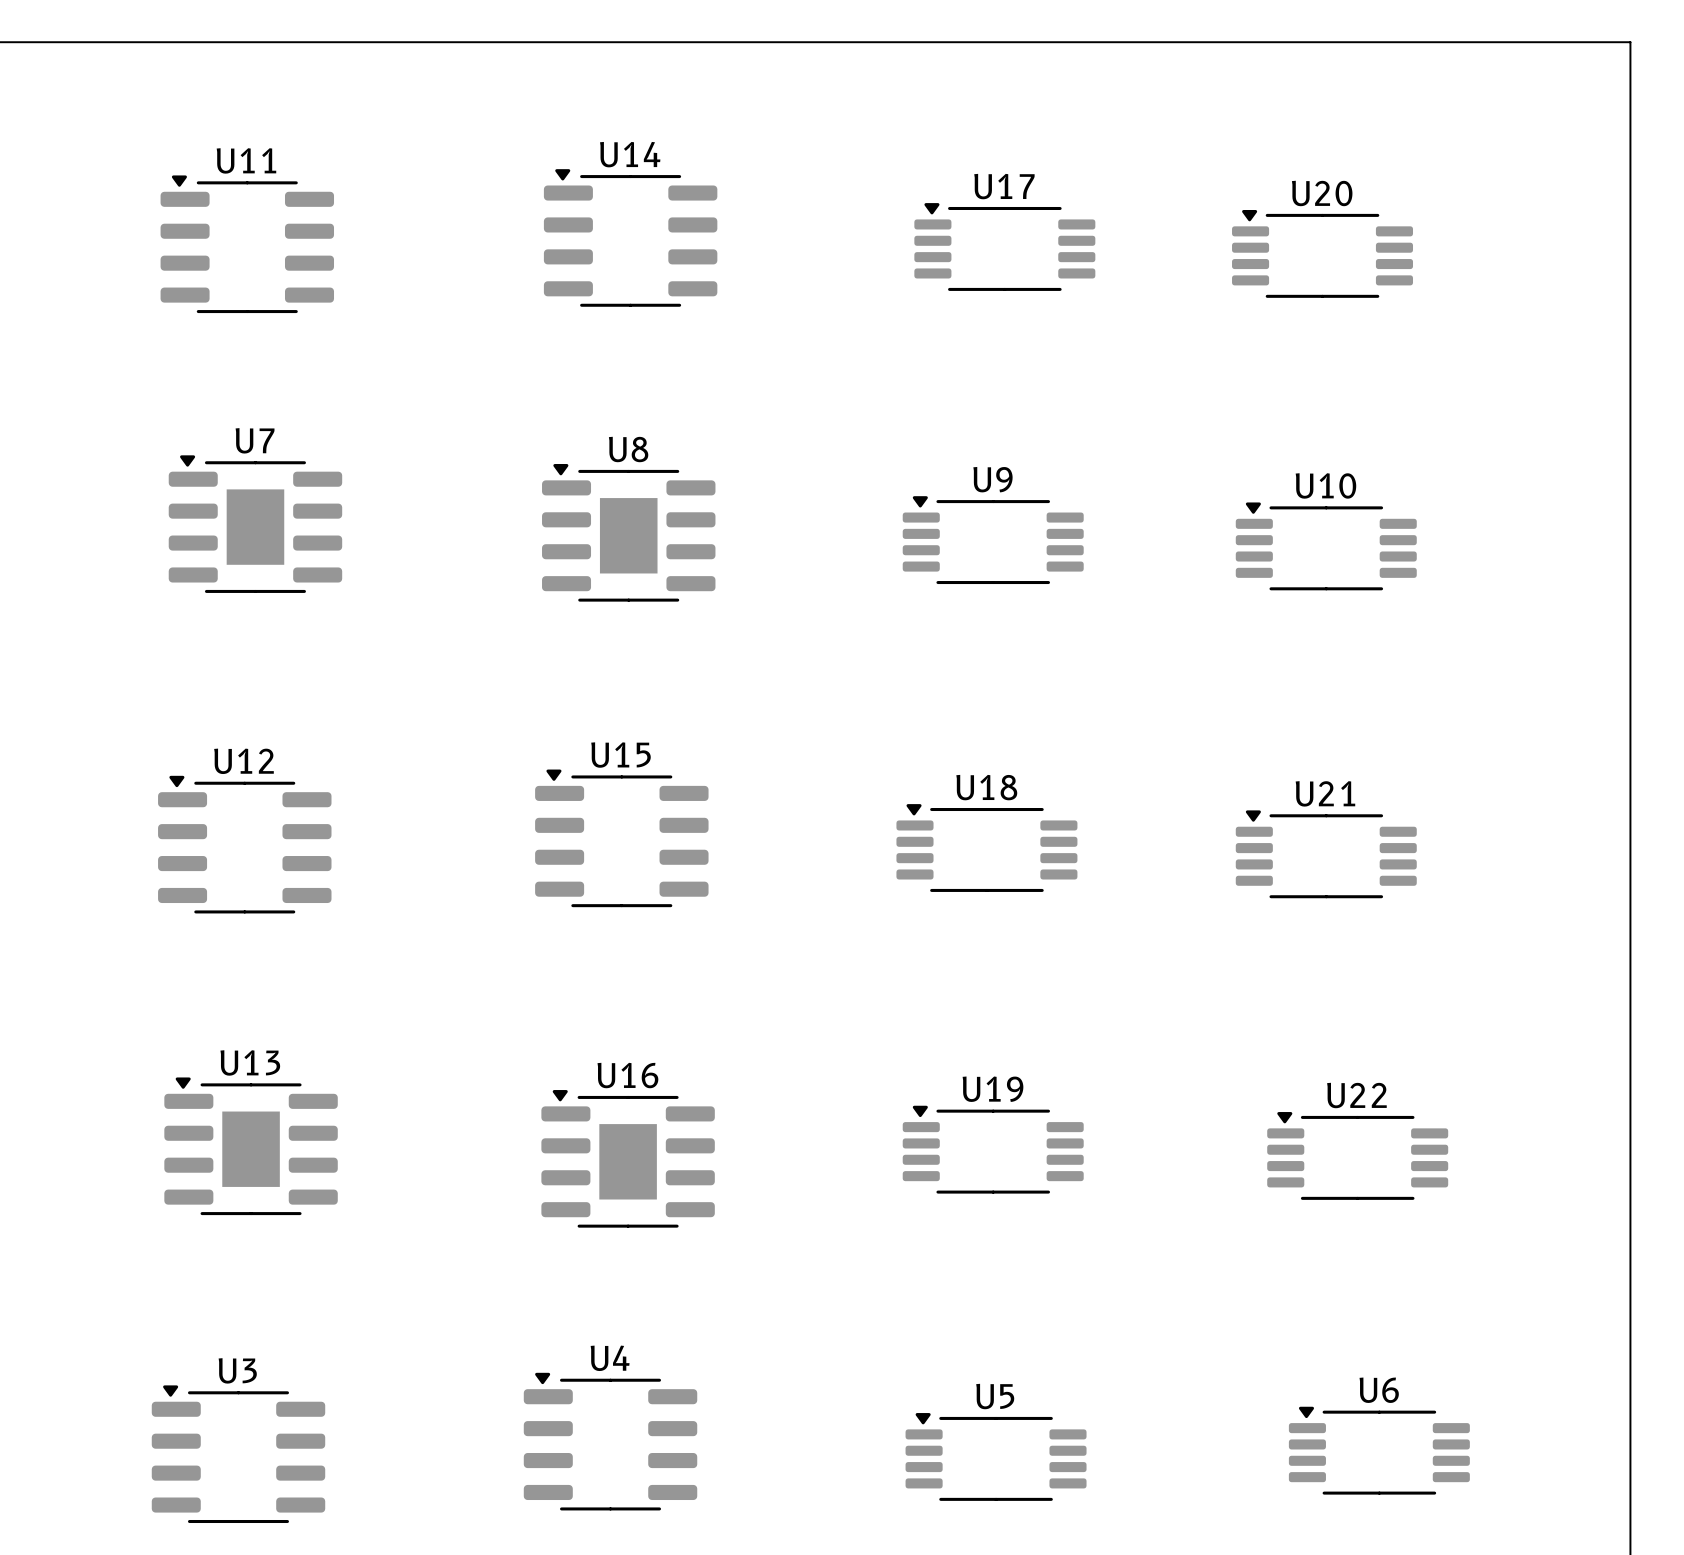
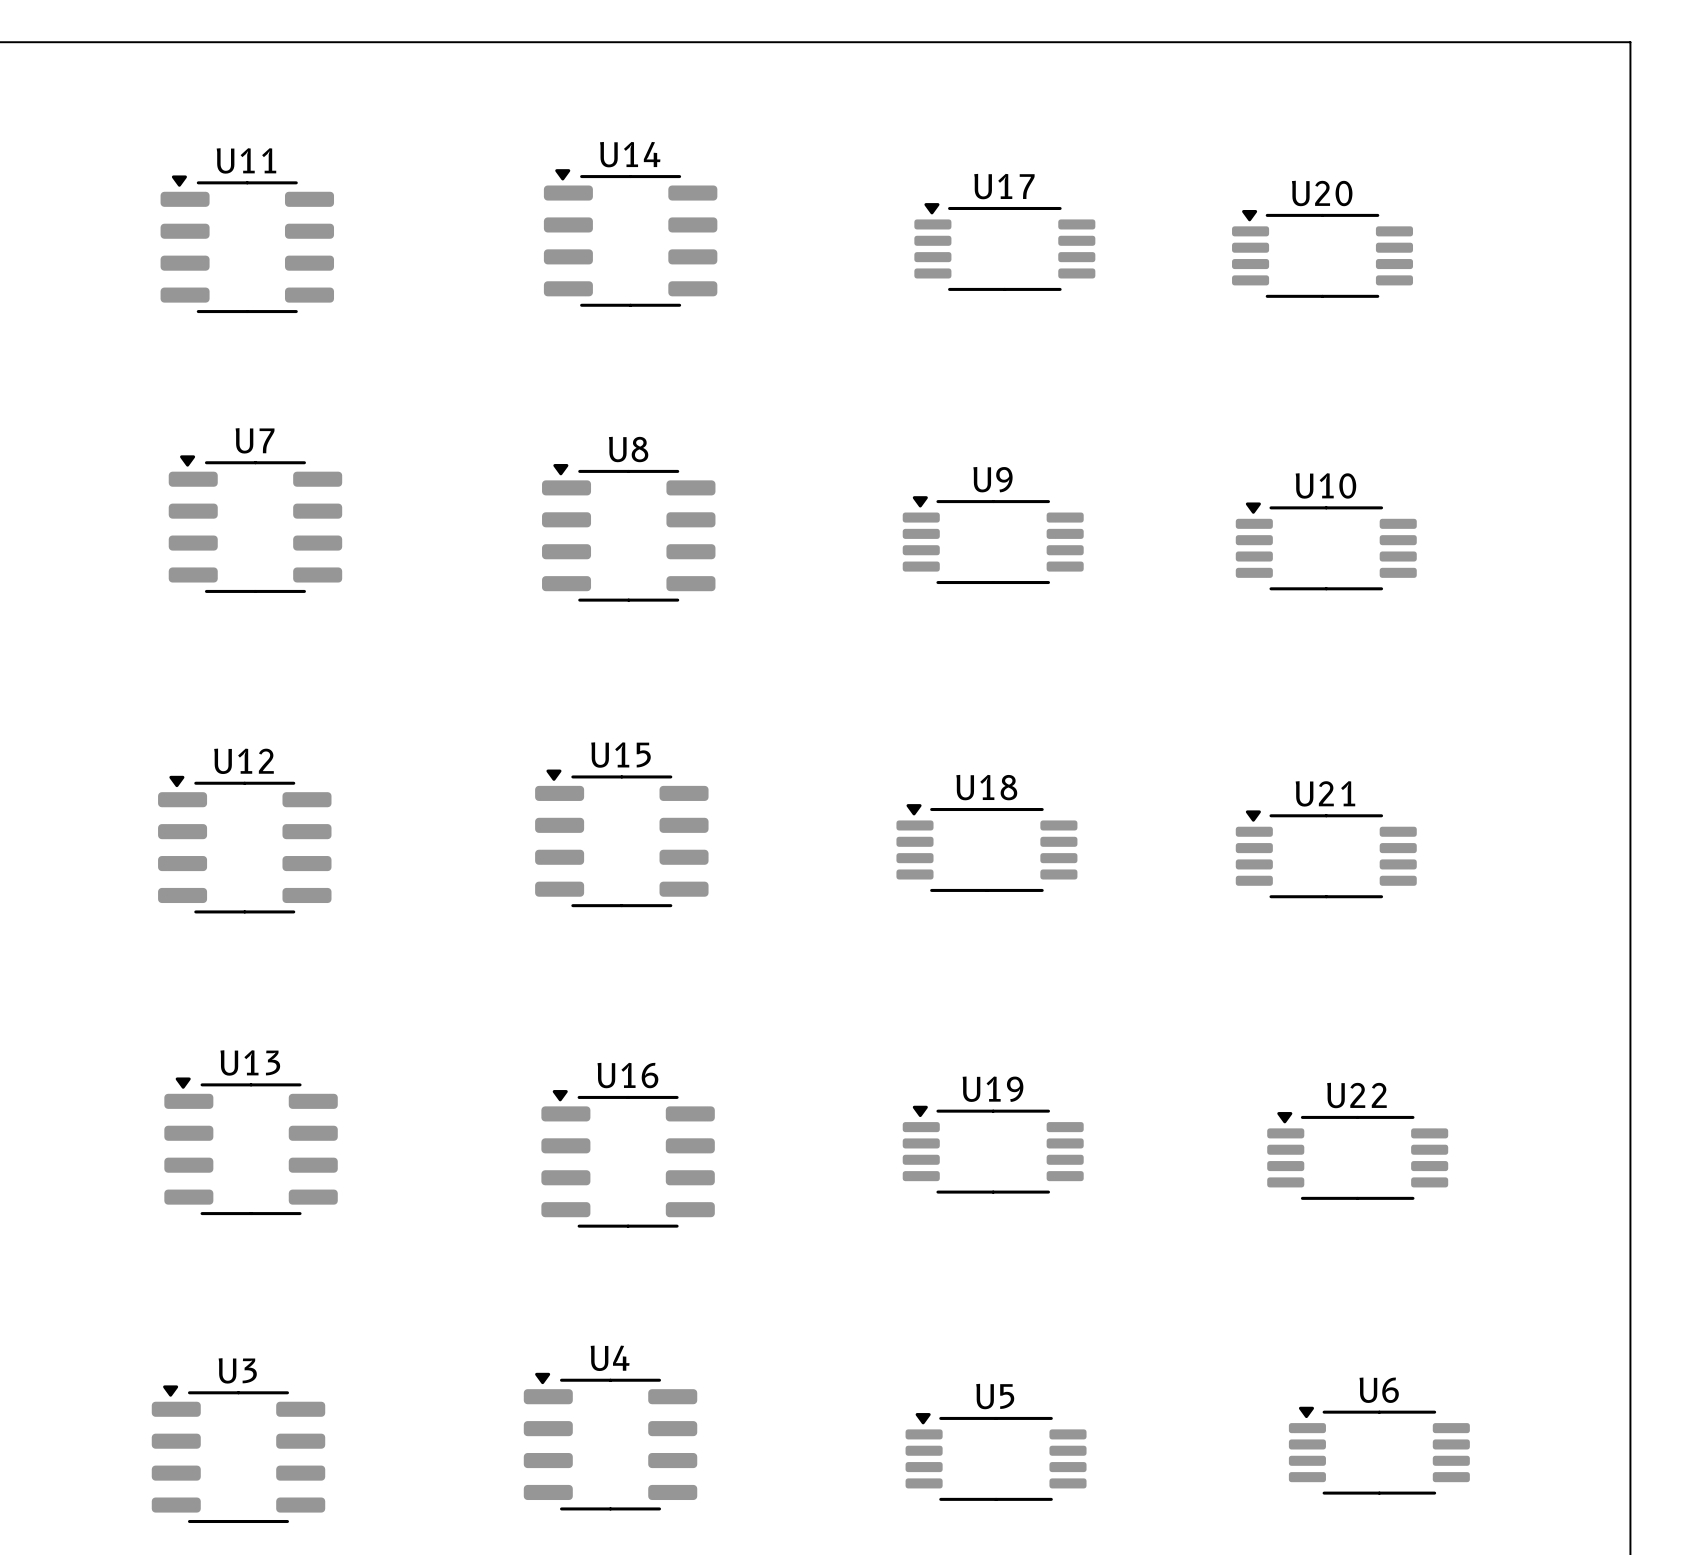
U7 footprint: [168, 455, 343, 593] -> [168, 455, 343, 593]
U8 footprint: [542, 464, 716, 602] -> [542, 464, 716, 602]
U13 footprint: [164, 1077, 338, 1216] -> [164, 1077, 338, 1216]
U16 footprint: [541, 1090, 715, 1228] -> [541, 1090, 715, 1228]

